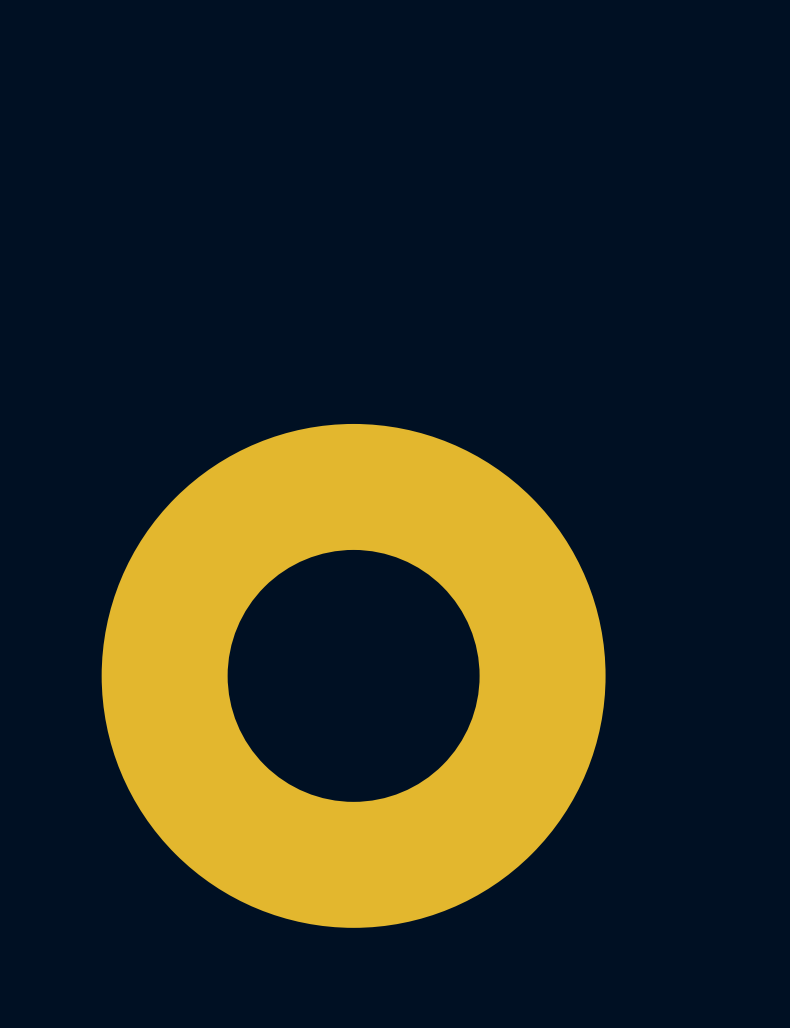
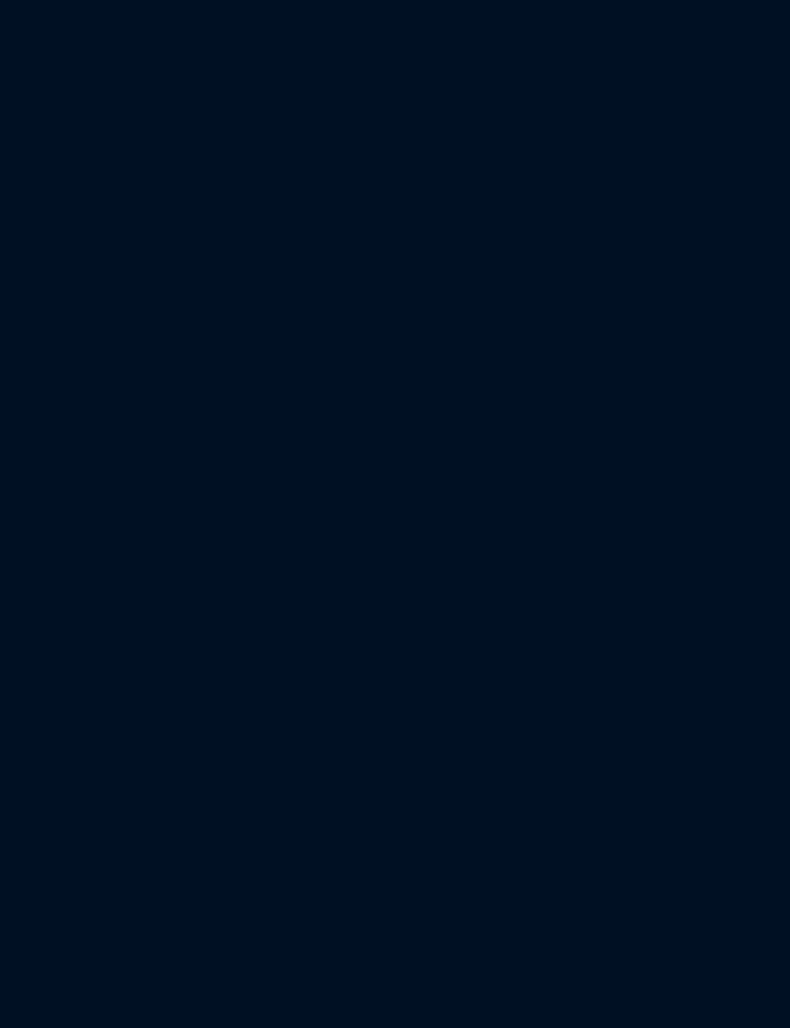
part: (353, 675) -> none

